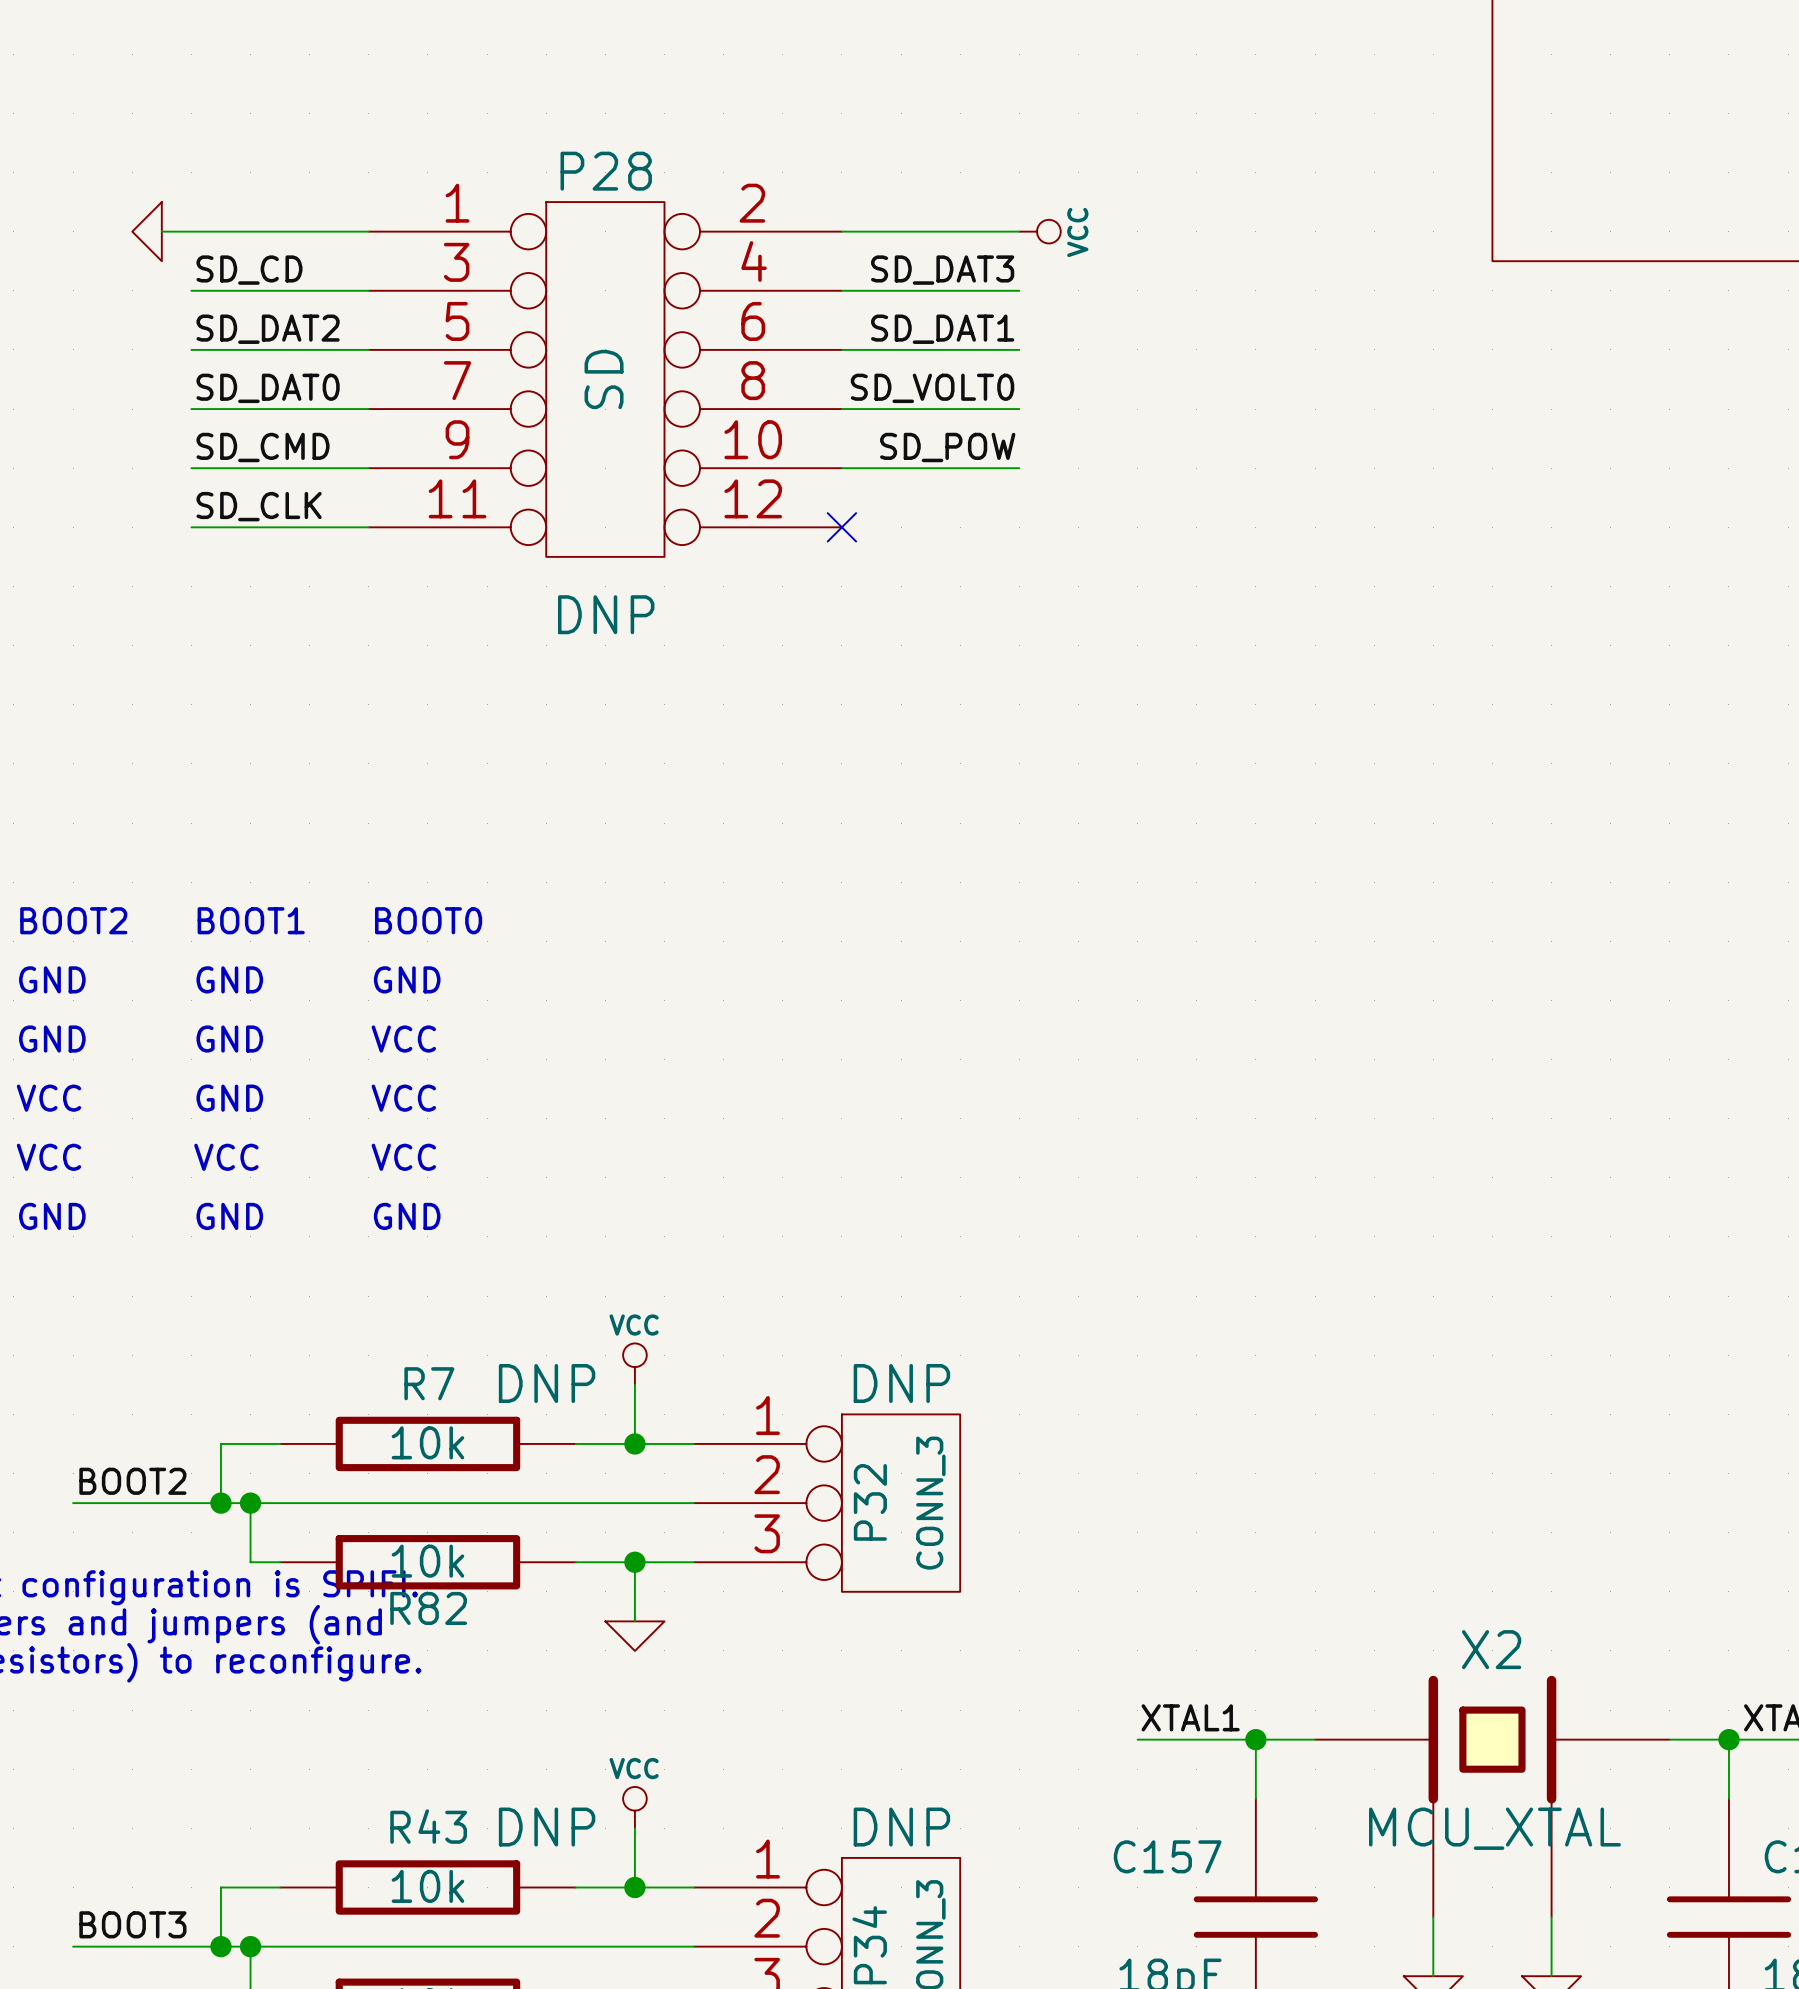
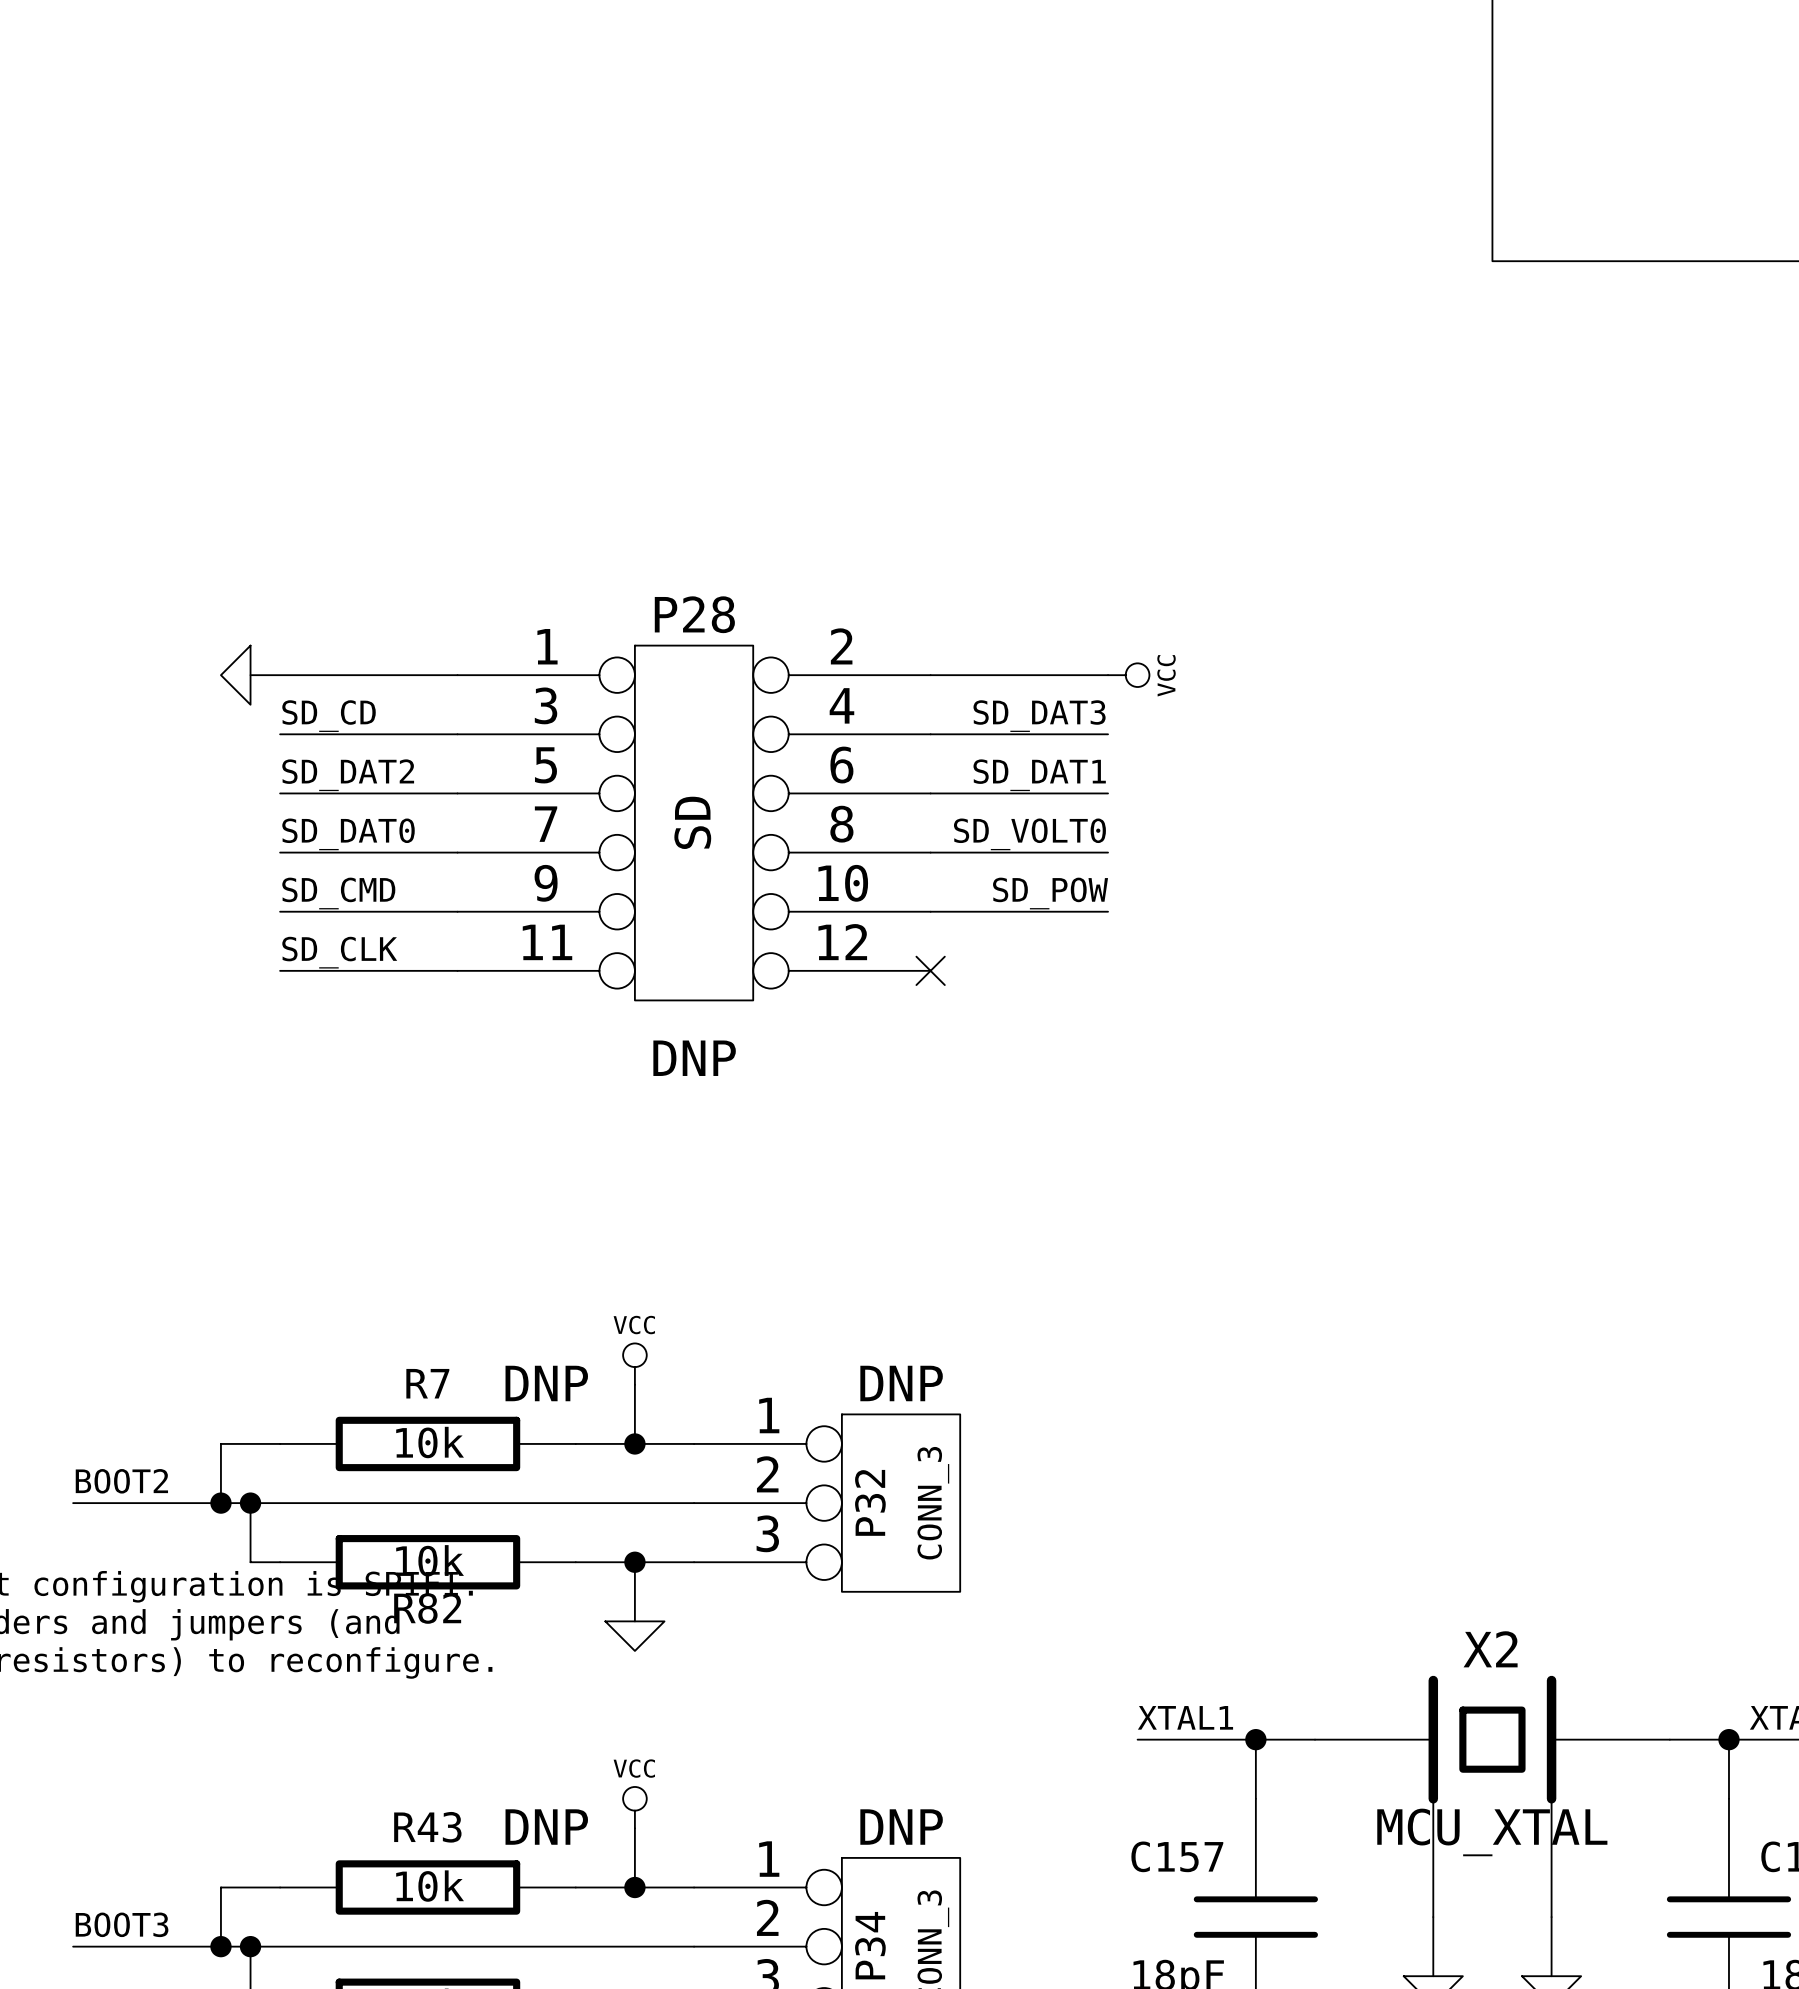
power symbol position: (147, 231) -> (235, 675)
wire: (161, 231) (368, 231) -> (250, 675) (457, 675)
wire: (841, 231) (1019, 231) -> (930, 675) (1108, 675)
power symbol position: VCC (1040, 231) -> VCC (1128, 675)
label position: SD_CD (249, 270) -> SD_CD (329, 716)
label position: SD_DAT3 (942, 270) -> SD_DAT3 (1039, 716)
wire: (191, 290) (368, 290) -> (280, 734) (457, 734)
wire: (841, 290) (1019, 290) -> (930, 734) (1108, 734)
label position: SD_DAT2 (268, 329) -> SD_DAT2 (348, 775)
label position: SD_DAT1 (942, 329) -> SD_DAT1 (1039, 775)
wire: (191, 349) (368, 349) -> (280, 793) (457, 793)
wire: (841, 349) (1019, 349) -> (930, 793) (1108, 793)
P28 position: (605, 379) -> (694, 823)
label position: SD_DAT0 (268, 388) -> SD_DAT0 (348, 834)
label position: SD_VOLT0 (932, 388) -> SD_VOLT0 (1029, 834)
wire: (191, 409) (368, 409) -> (280, 852) (457, 852)
wire: (841, 409) (1019, 409) -> (930, 852) (1108, 852)
label position: SD_CMD (263, 447) -> SD_CMD (338, 893)
label position: SD_POW (947, 447) -> SD_POW (1050, 893)
wire: (191, 468) (368, 468) -> (280, 911) (457, 911)
wire: (841, 468) (1019, 468) -> (930, 911) (1108, 911)
label position: SD_CLK (259, 506) -> SD_CLK (339, 952)
wire: (191, 527) (368, 527) -> (280, 970) (457, 970)
no-connect mark: (841, 527) -> none
text: BOOT2 (73, 920) -> none
text: BOOT1 (251, 920) -> none
text: BOOT0 (428, 920) -> none
no-connect mark: none -> (930, 970)
text: GND (52, 979) -> none
text: GND (229, 979) -> none
text: GND (407, 979) -> none
text: GND (52, 1039) -> none
text: GND (229, 1039) -> none
text: VCC (403, 1039) -> none
text: VCC (48, 1098) -> none
text: GND (229, 1098) -> none
text: VCC (403, 1098) -> none
text: VCC (48, 1157) -> none
text: VCC (226, 1157) -> none
text: VCC (403, 1157) -> none
text: GND (52, 1216) -> none
text: GND (229, 1216) -> none
text: GND (407, 1216) -> none

